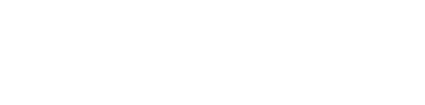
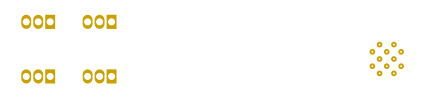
part: none -> (38, 21)
part: none -> (99, 21)
part: none -> (386, 58)
part: none -> (38, 76)
part: none -> (99, 76)

